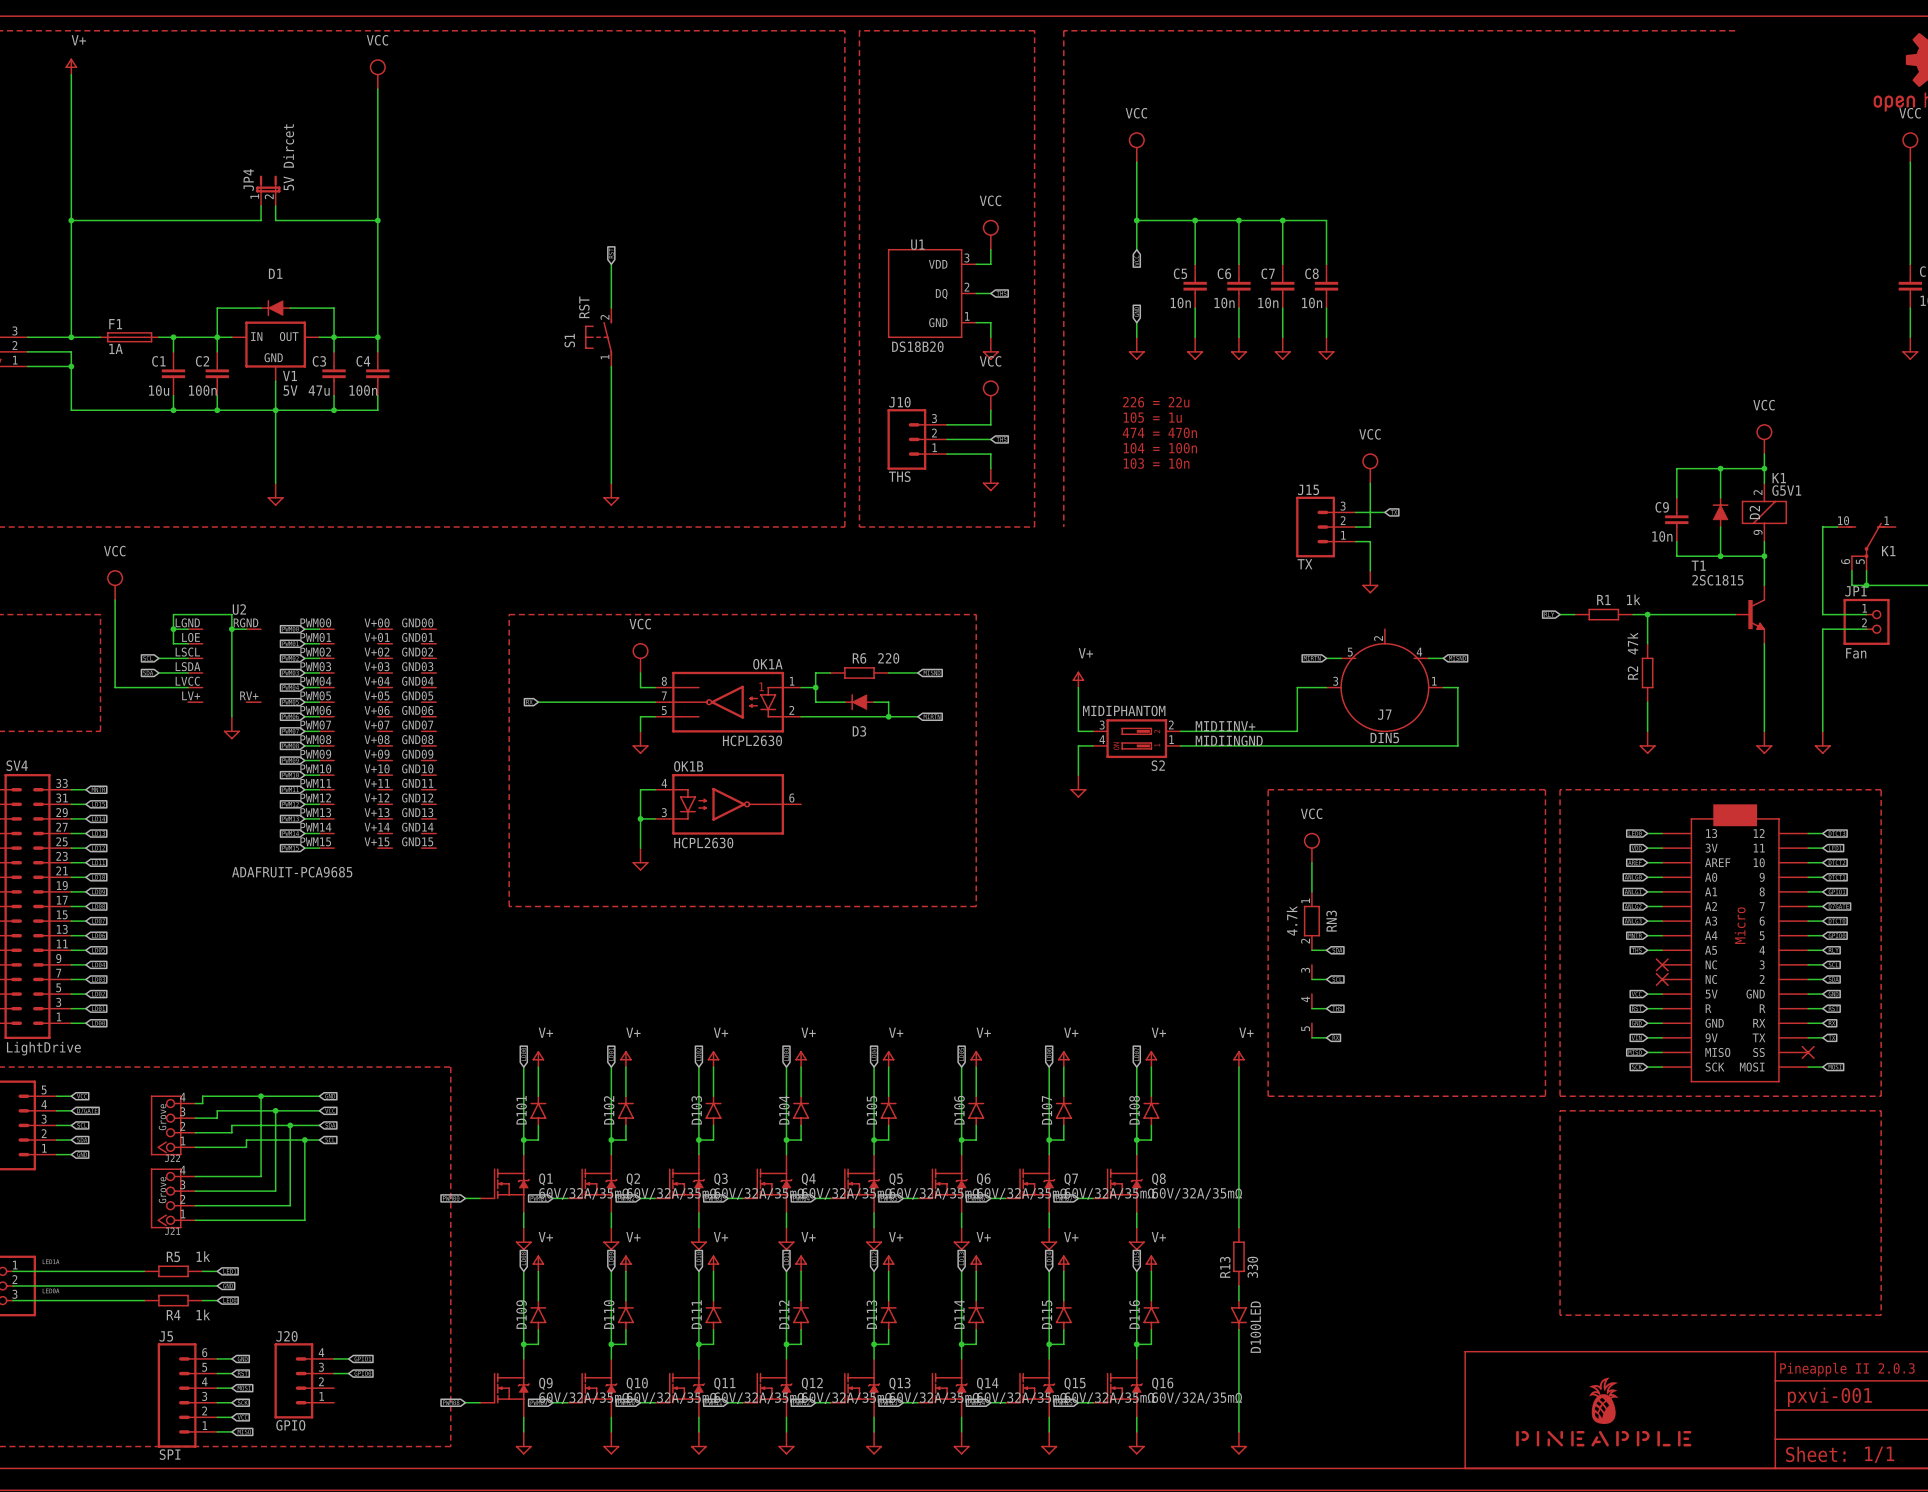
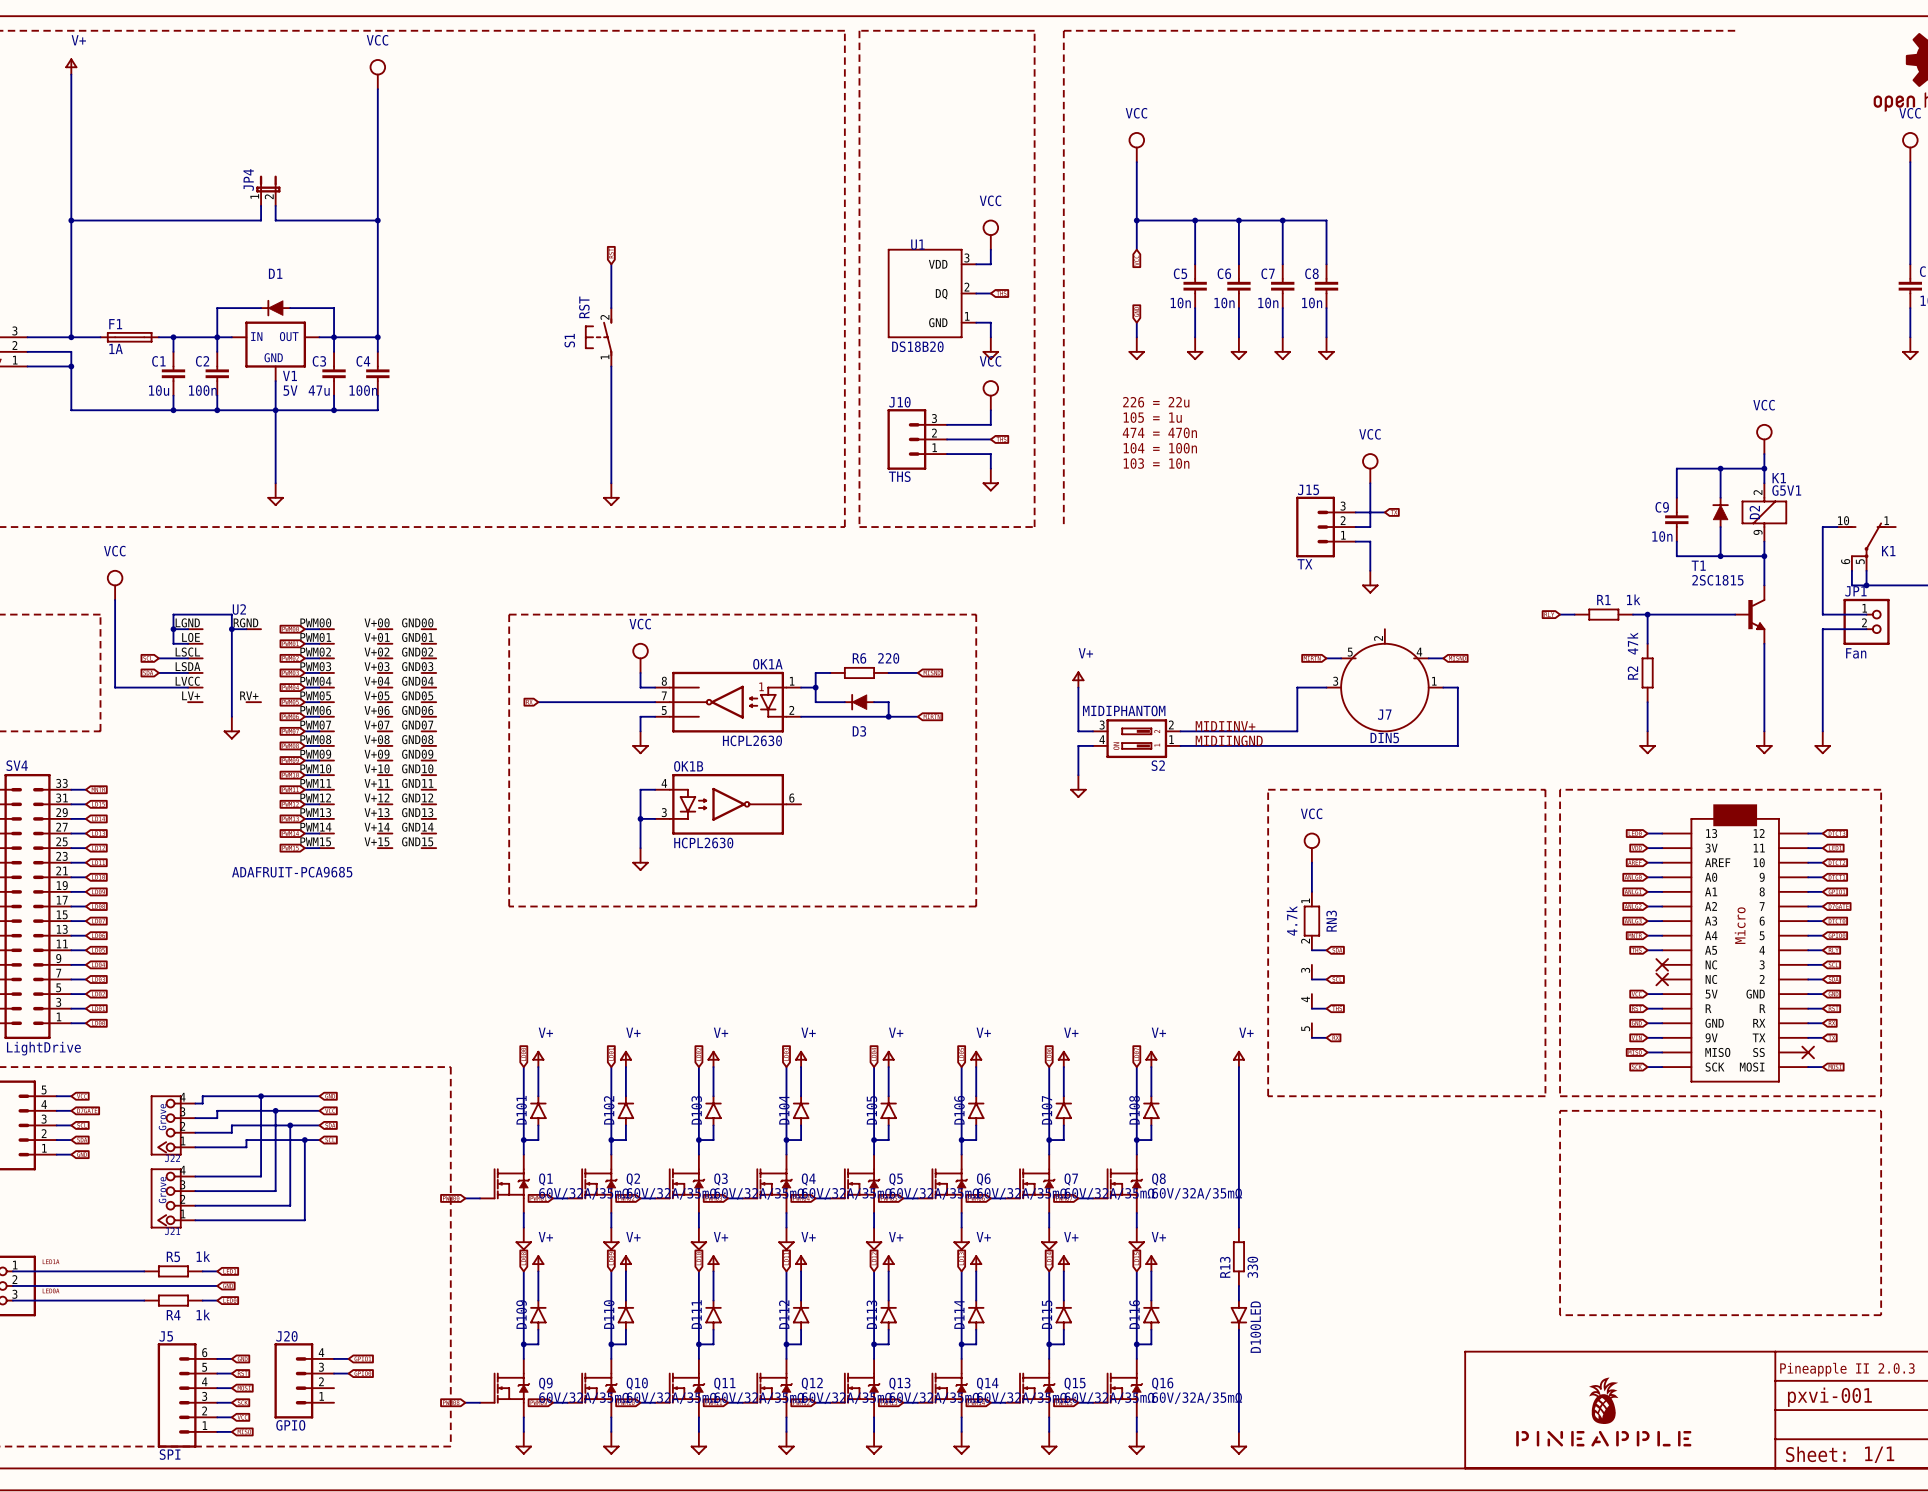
JP4 value: 5V Dircet (288, 157) -> none

